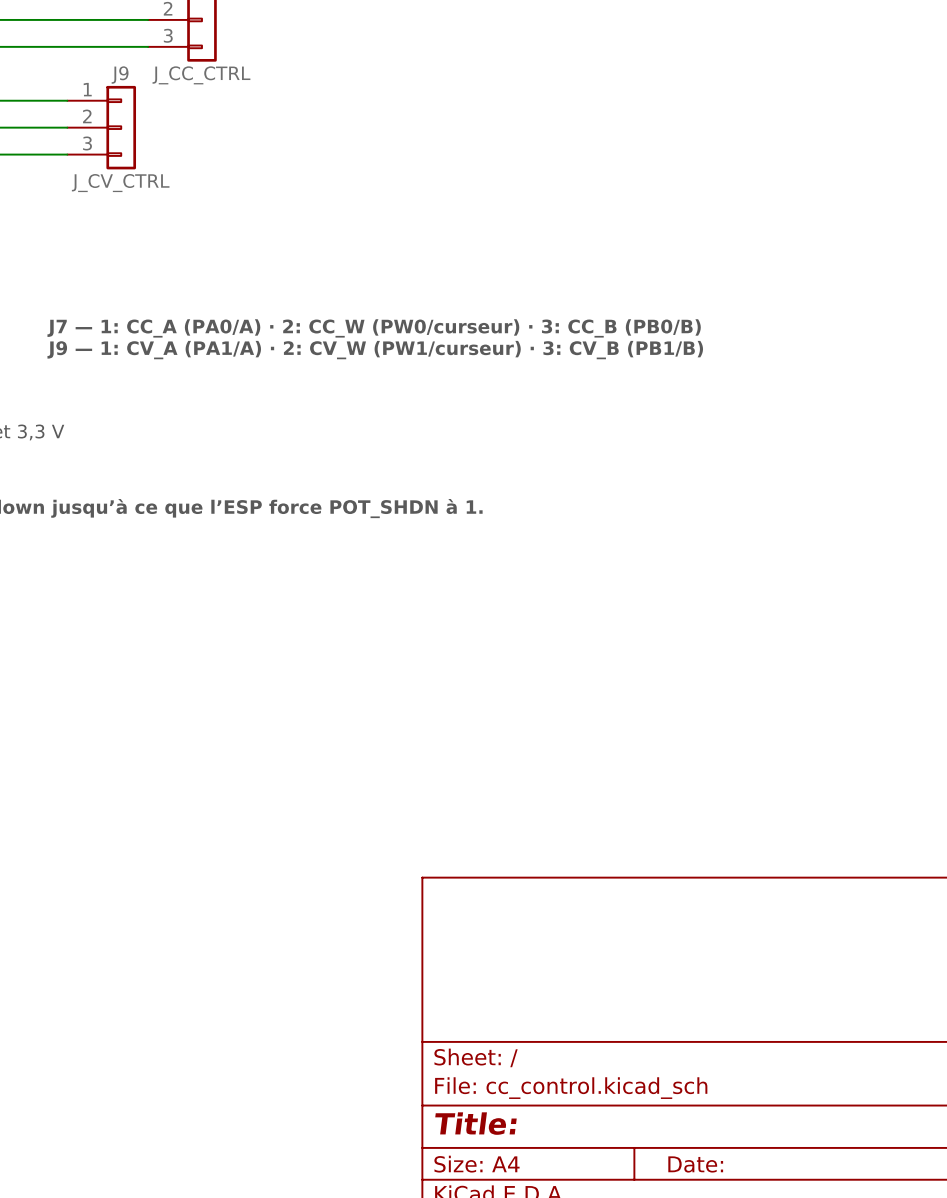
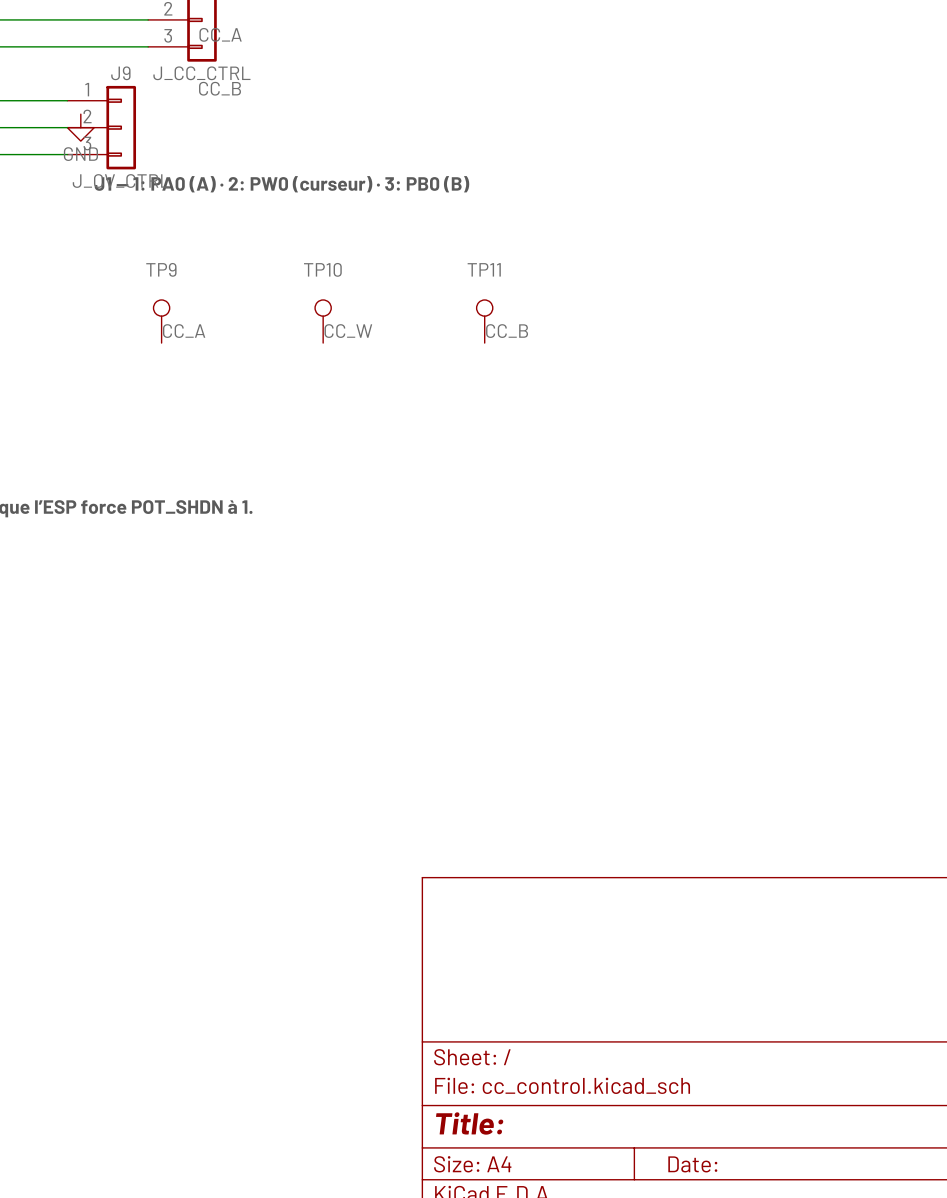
label: none -> CC_A (220, 34)
label: none -> CC_B (220, 88)
power symbol: none -> GND (80, 127)
text: none -> J1 — 1: PA0 (A) · 2: PW0 (curseur) · 3: PB0 (B) (281, 184)
TP9: none -> (161, 321)
TP10: none -> (323, 321)
TP11: none -> (484, 321)
text: J7 — 1: CC_A (PA0/A) · 2: CC_W (PW0/curseur) · 3: CC_B (PB0/B) (374, 328) -> none
label: none -> CC_A (184, 331)
label: none -> CC_W (348, 331)
label: none -> CC_B (507, 331)
text: J9 — 1: CV_A (PA1/A) · 2: CV_W (PW1/curseur) · 3: CV_B (PB1/B) (375, 350) -> none

